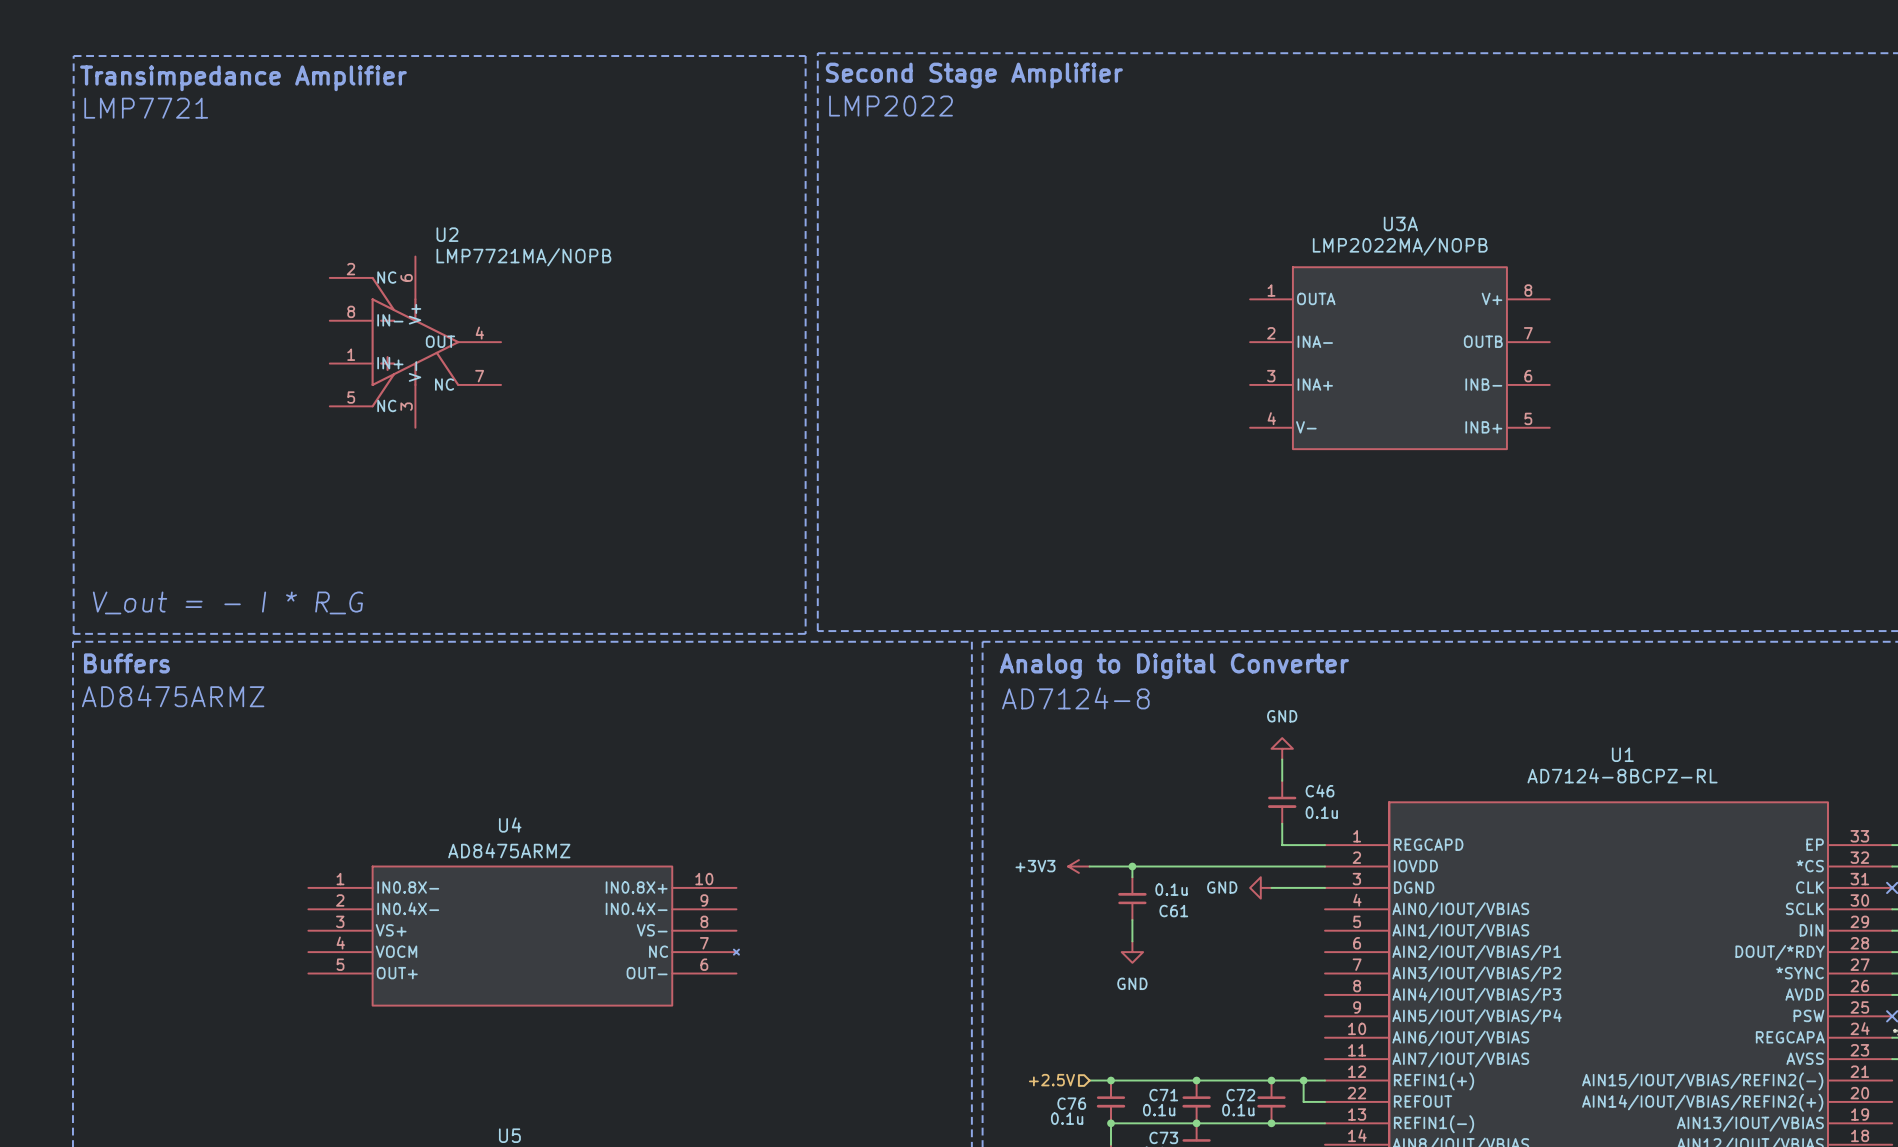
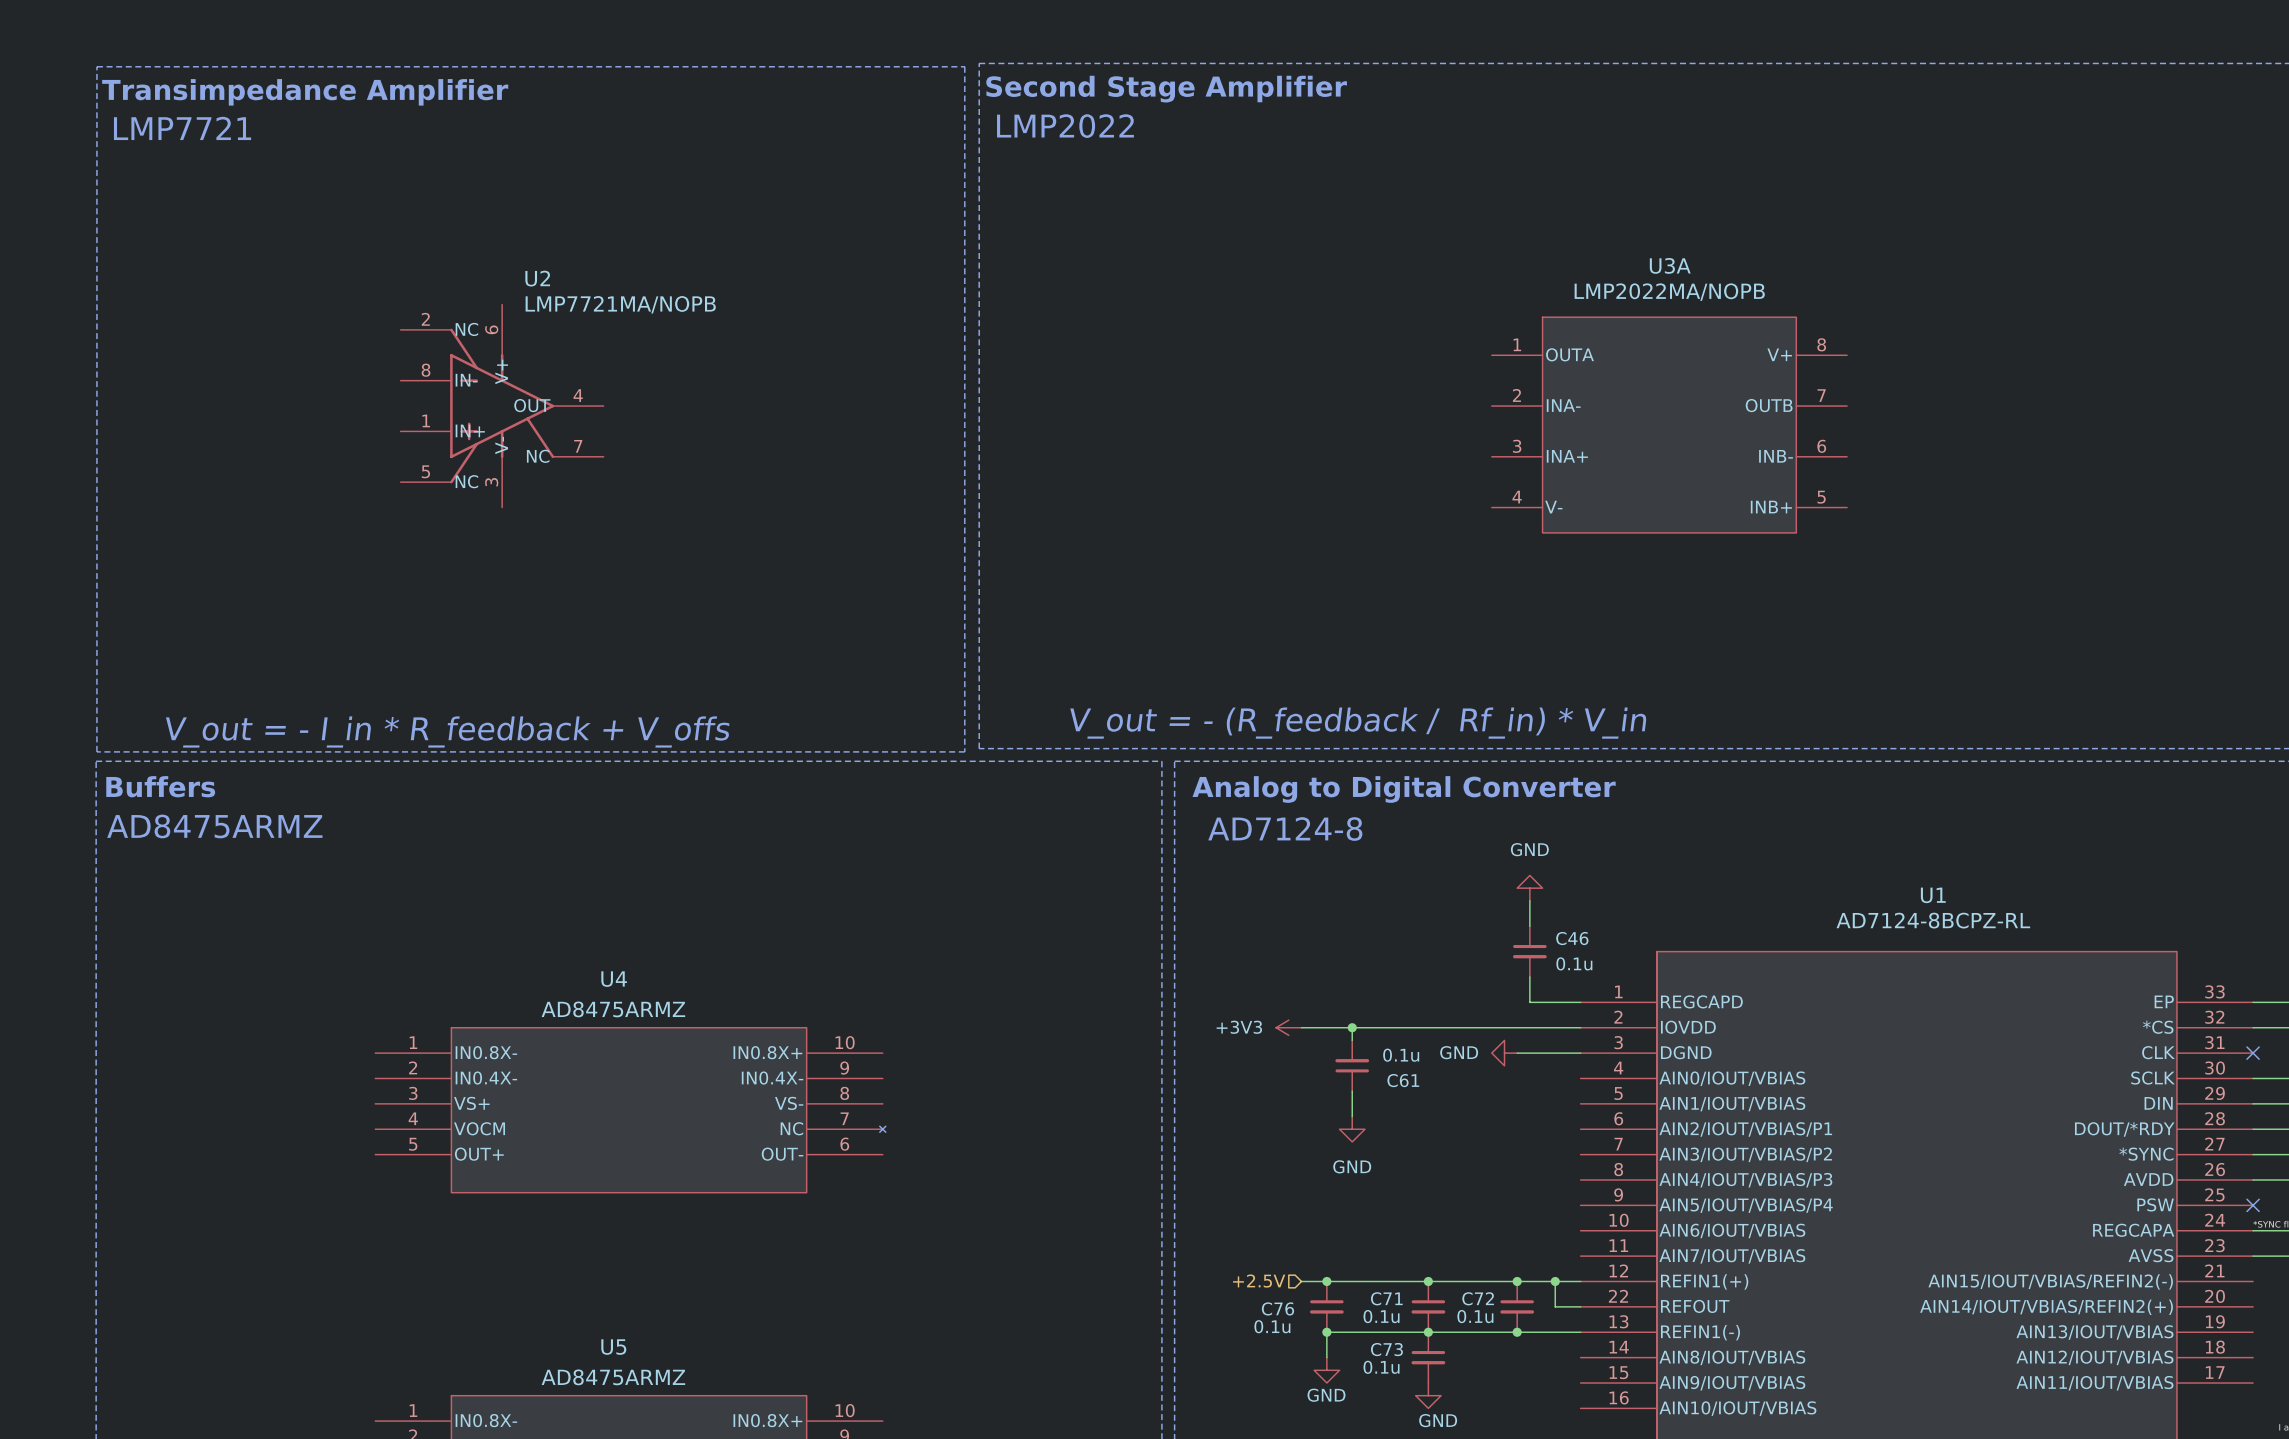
text: V_out = - I * R_G (228, 602) -> V_out = - I_in * R_feedback + V_offs (447, 732)
text: none -> V_out = - (R_feedback / Rf_in) * V_in (1358, 723)

